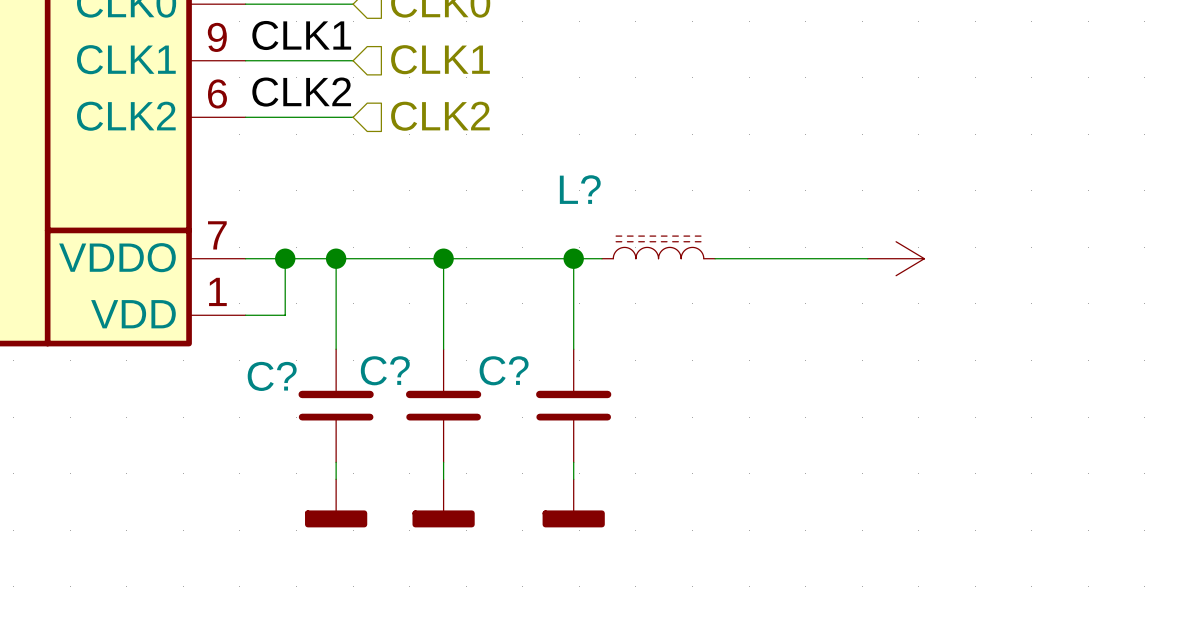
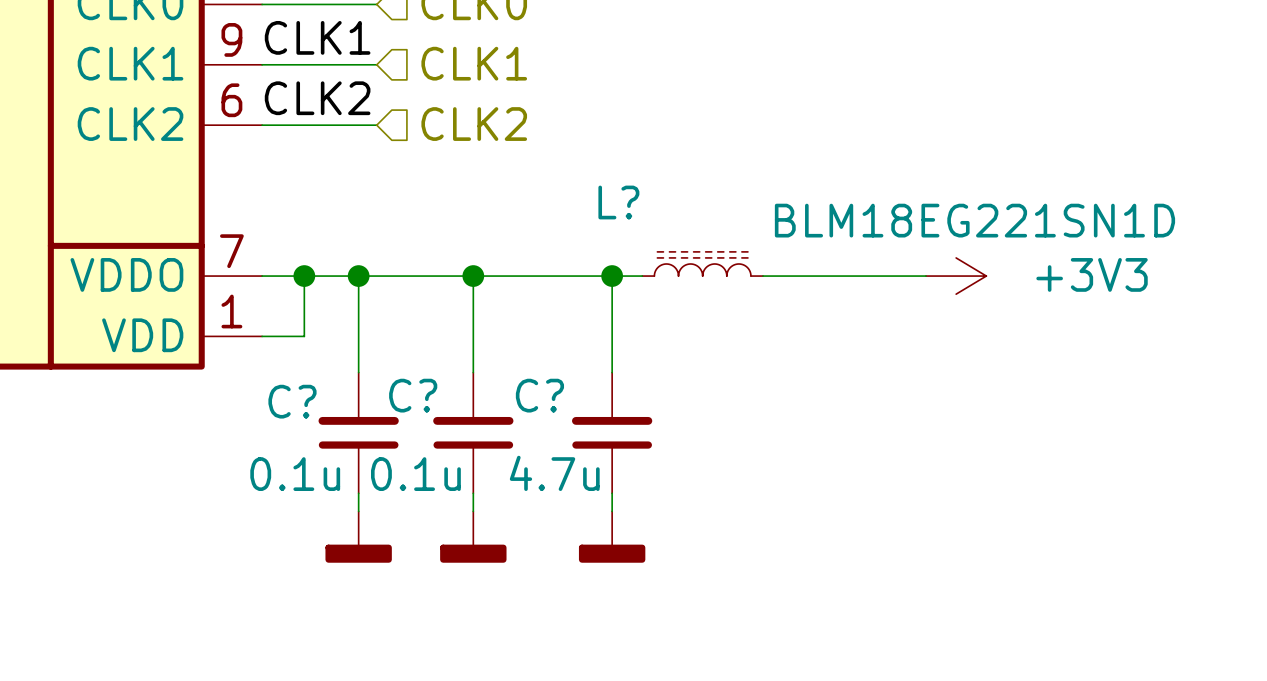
L? value: none -> BLM18EG221SN1D (974, 220)
power symbol text: none -> +3V3 (1092, 274)
C? value: none -> 0.1u (295, 474)
C? value: none -> 0.1u (415, 474)
C? value: none -> 4.7u (554, 473)

